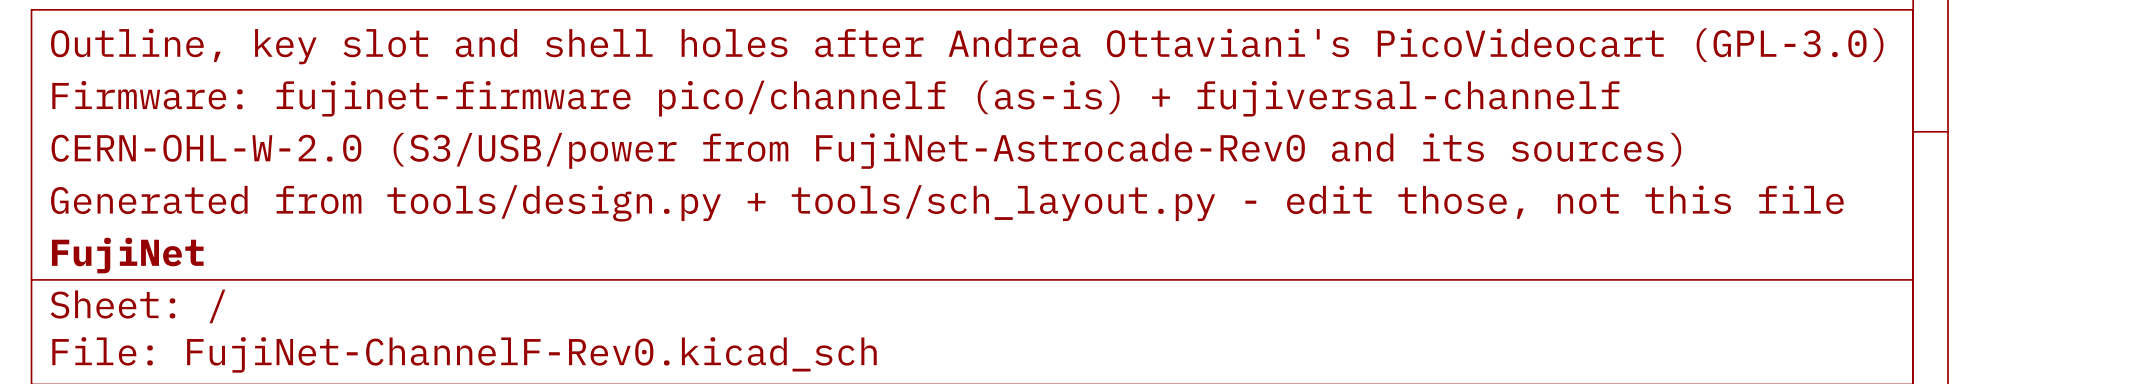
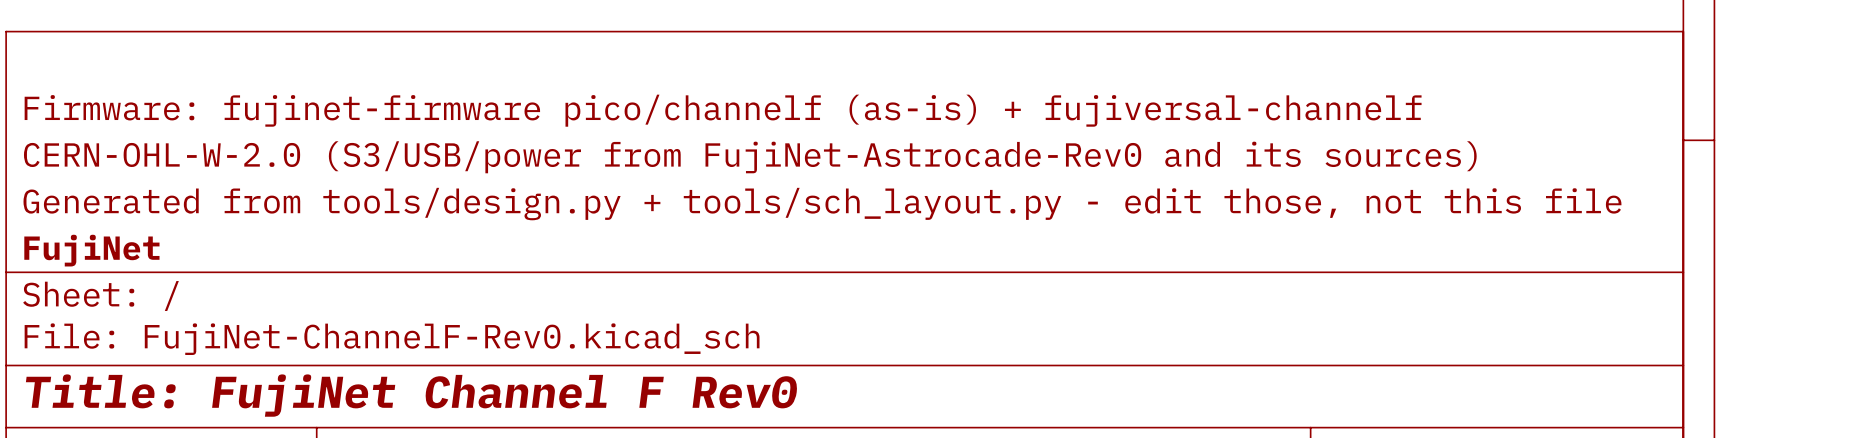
title block: Outline, key slot and shell holes after Andrea Ottaviani's PicoVideocart (GPL-3.0) (967, 46) -> none

